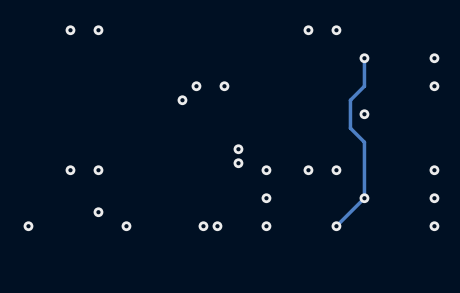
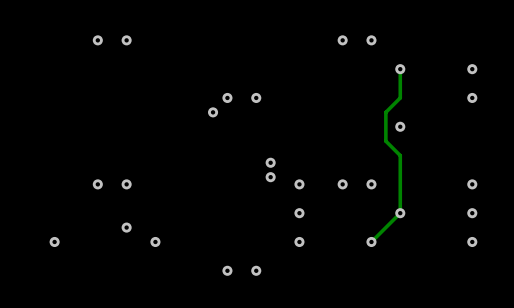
via: (203, 226) -> none
via: (217, 226) -> none
via: none -> (227, 270)
via: none -> (256, 270)

